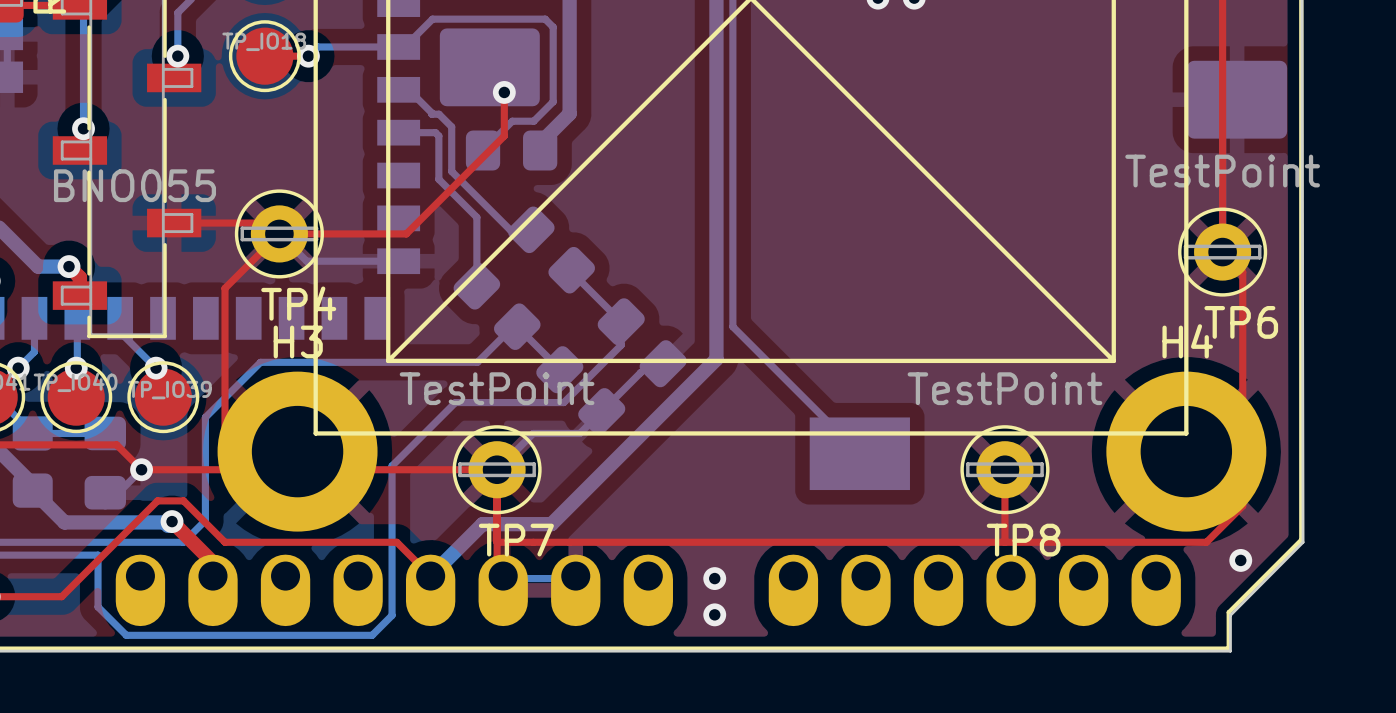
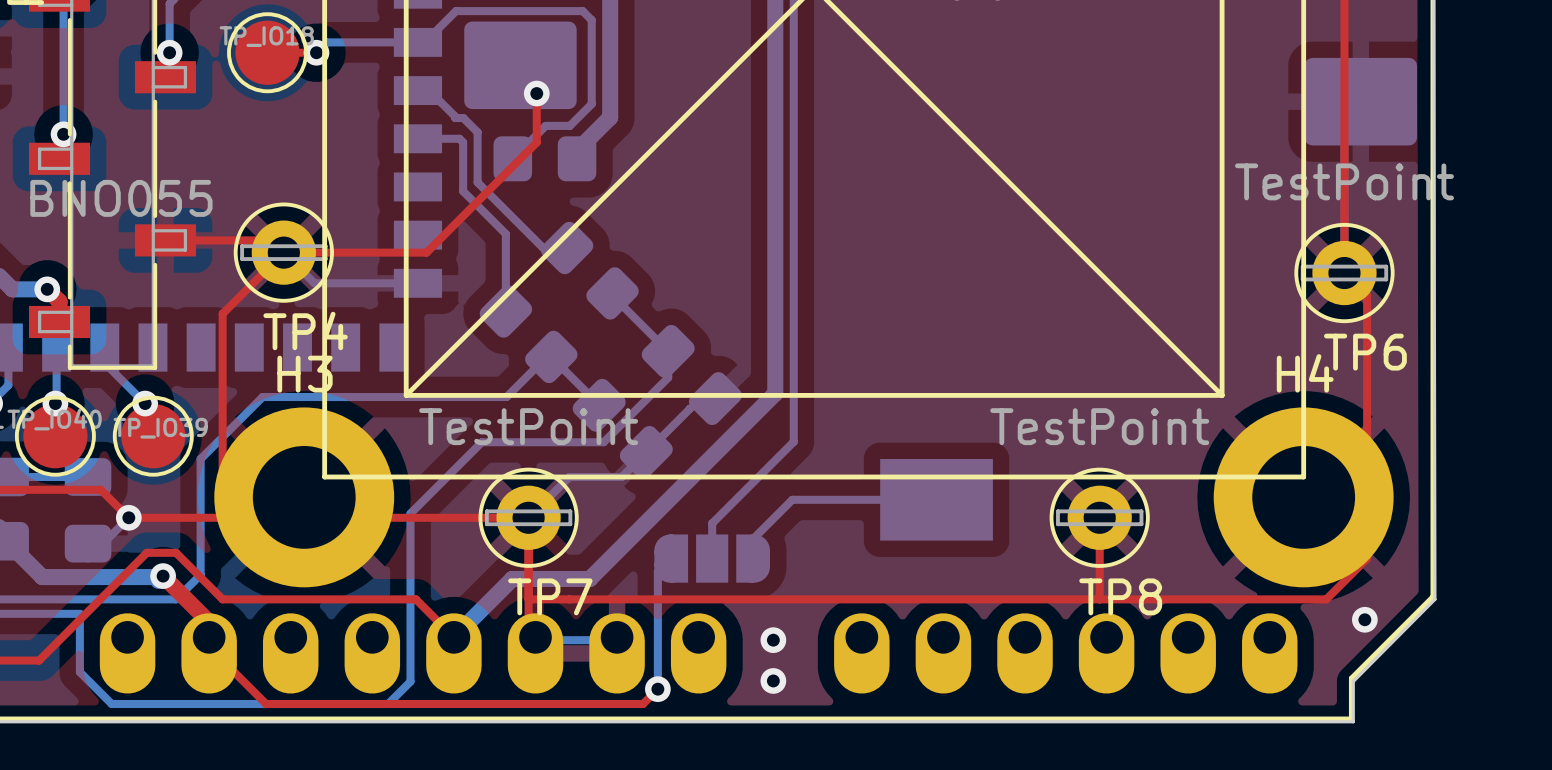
bottom track: (732, 326) (859, 453) -> (753, 538) (792, 499) (936, 499)
bottom track: none -> (793, 357) (793, 441) (712, 523) (712, 538)
bottom track: none -> (670, 538) (670, 558) (657, 571) (657, 689)
part: none -> (712, 558)
top track: none -> (209, 647) (266, 704) (643, 704) (657, 689)
via: none -> (657, 689)

